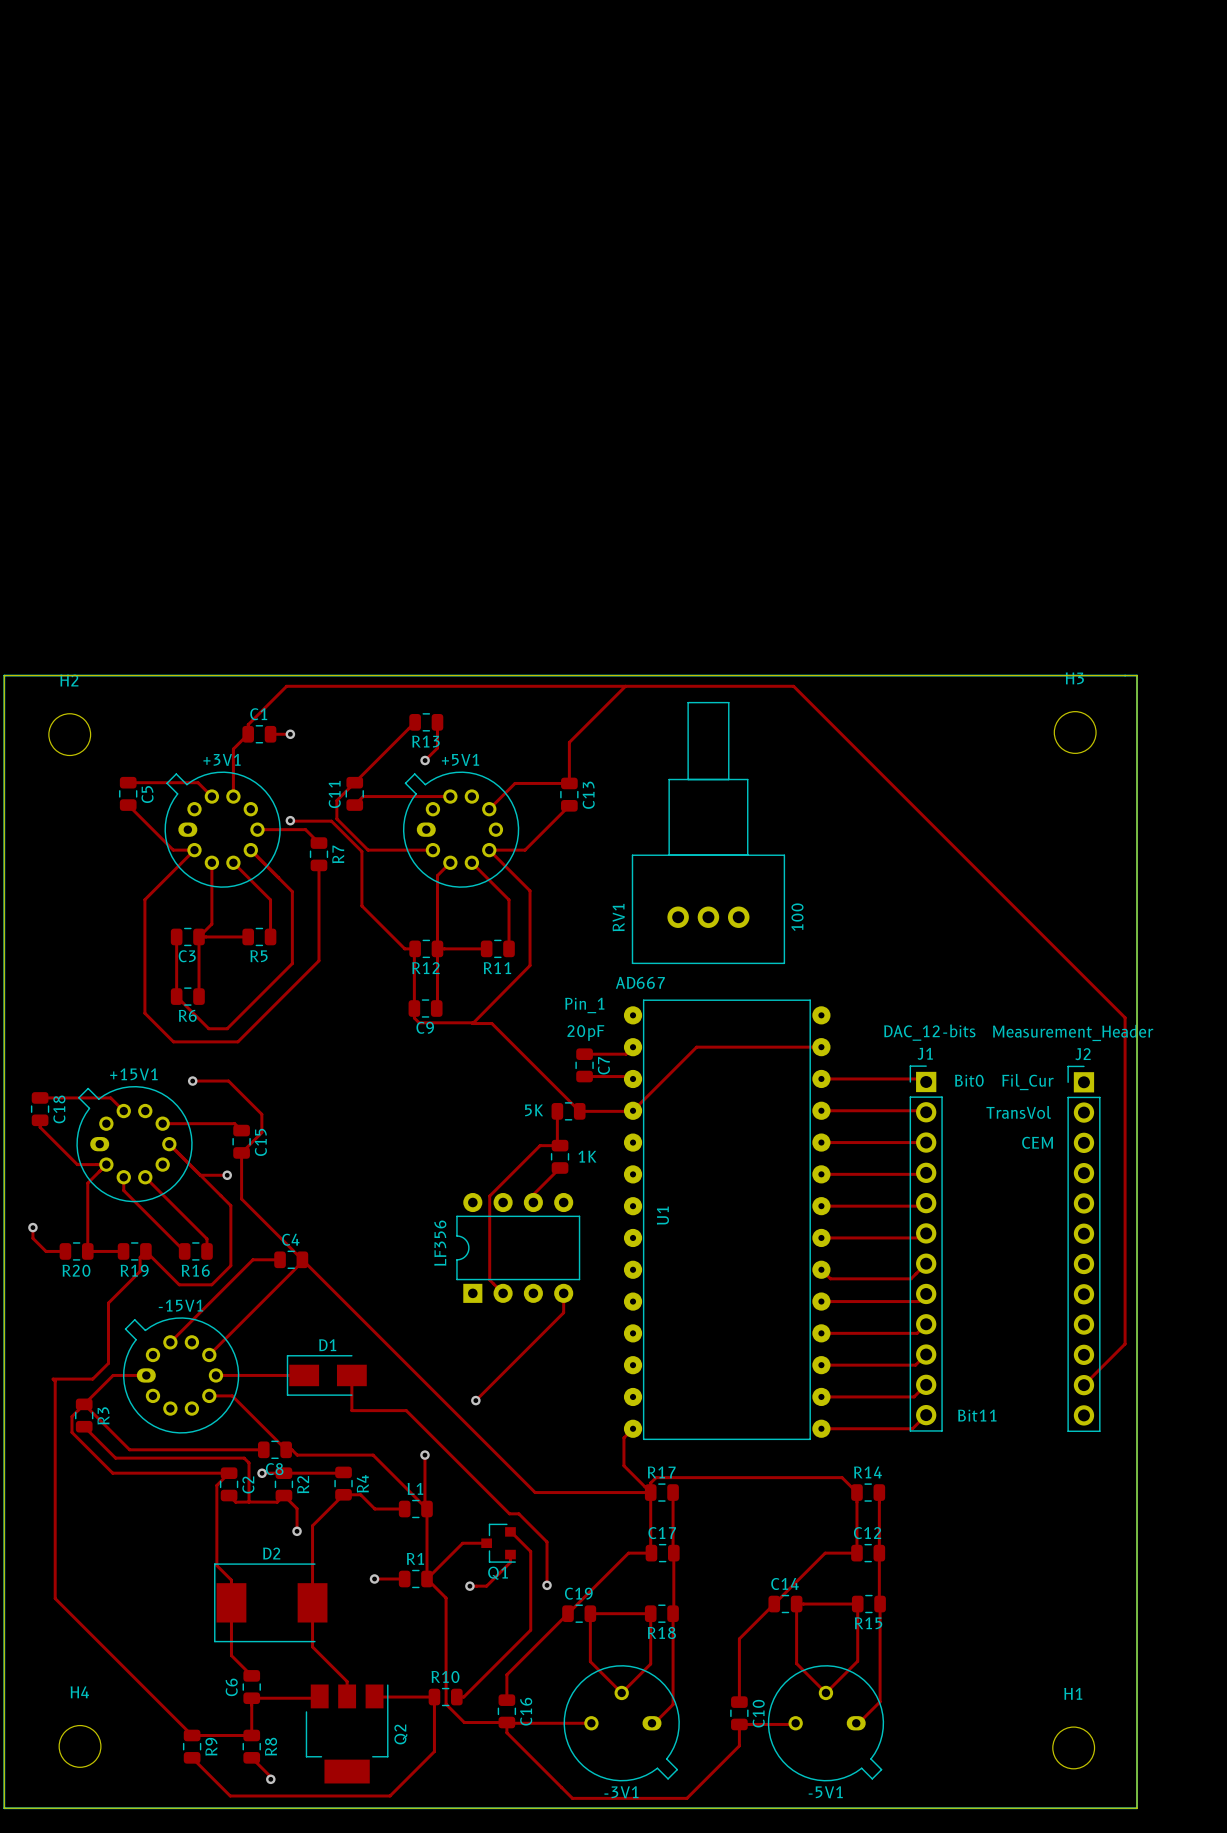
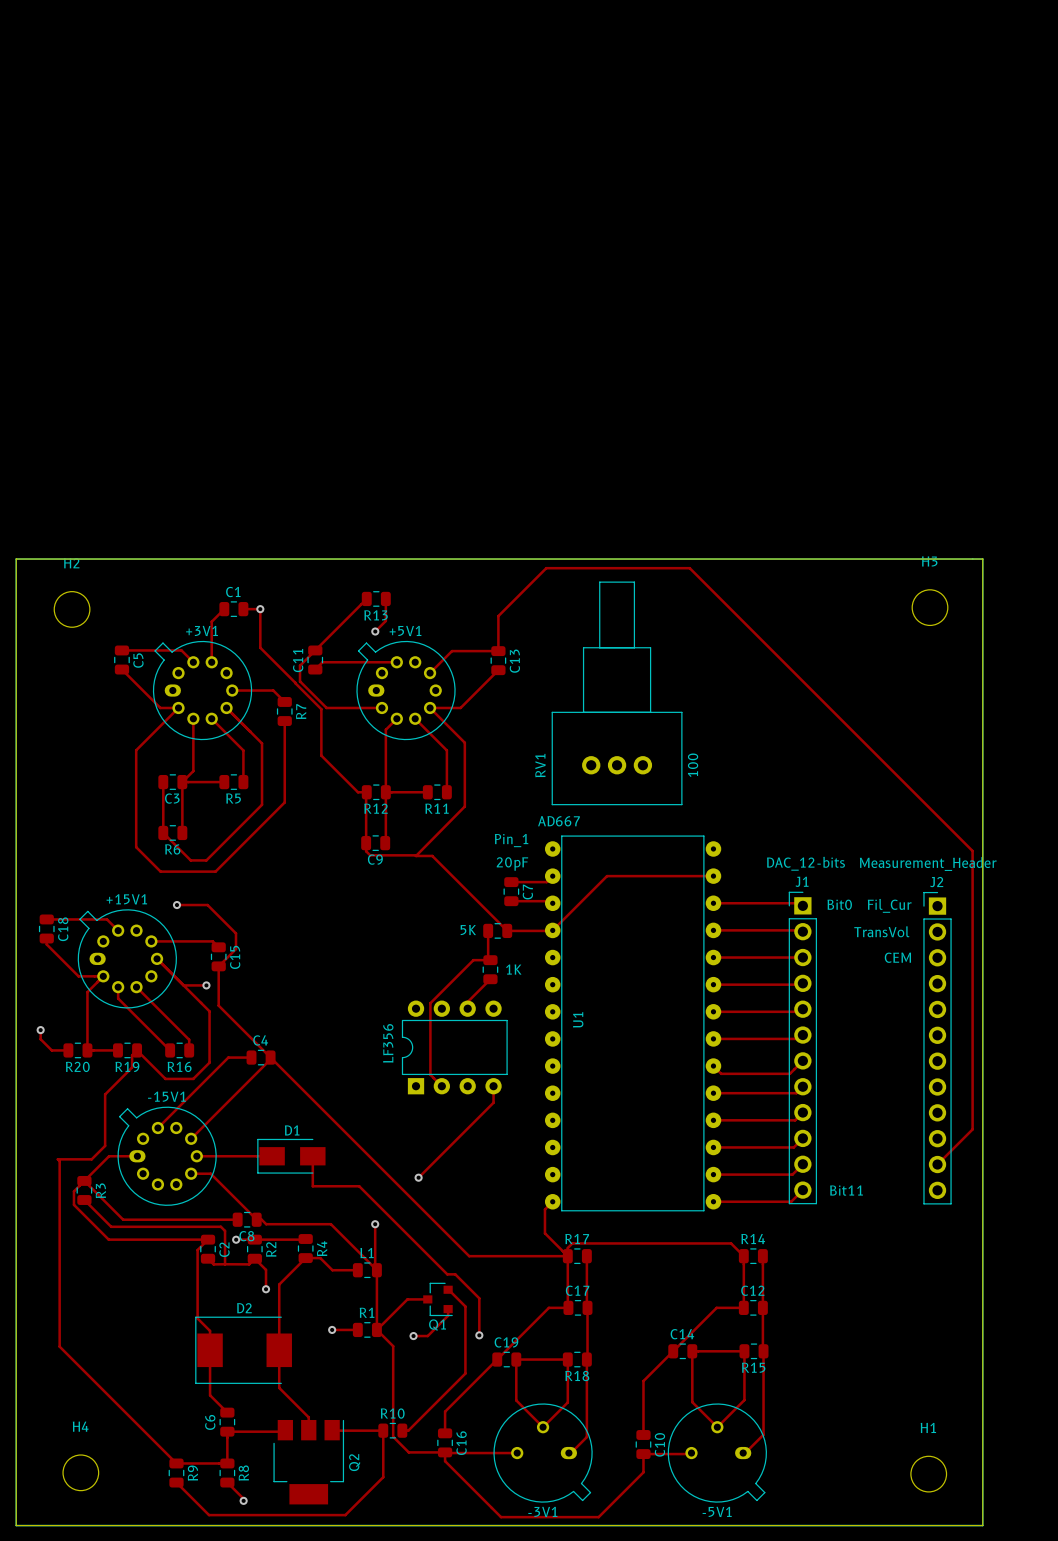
track: (625, 686) (286, 686) (248, 724) (248, 734) -> none
track: (290, 820) (331, 821) -> (260, 609) (260, 647) (295, 683)
via: (290, 820) -> none

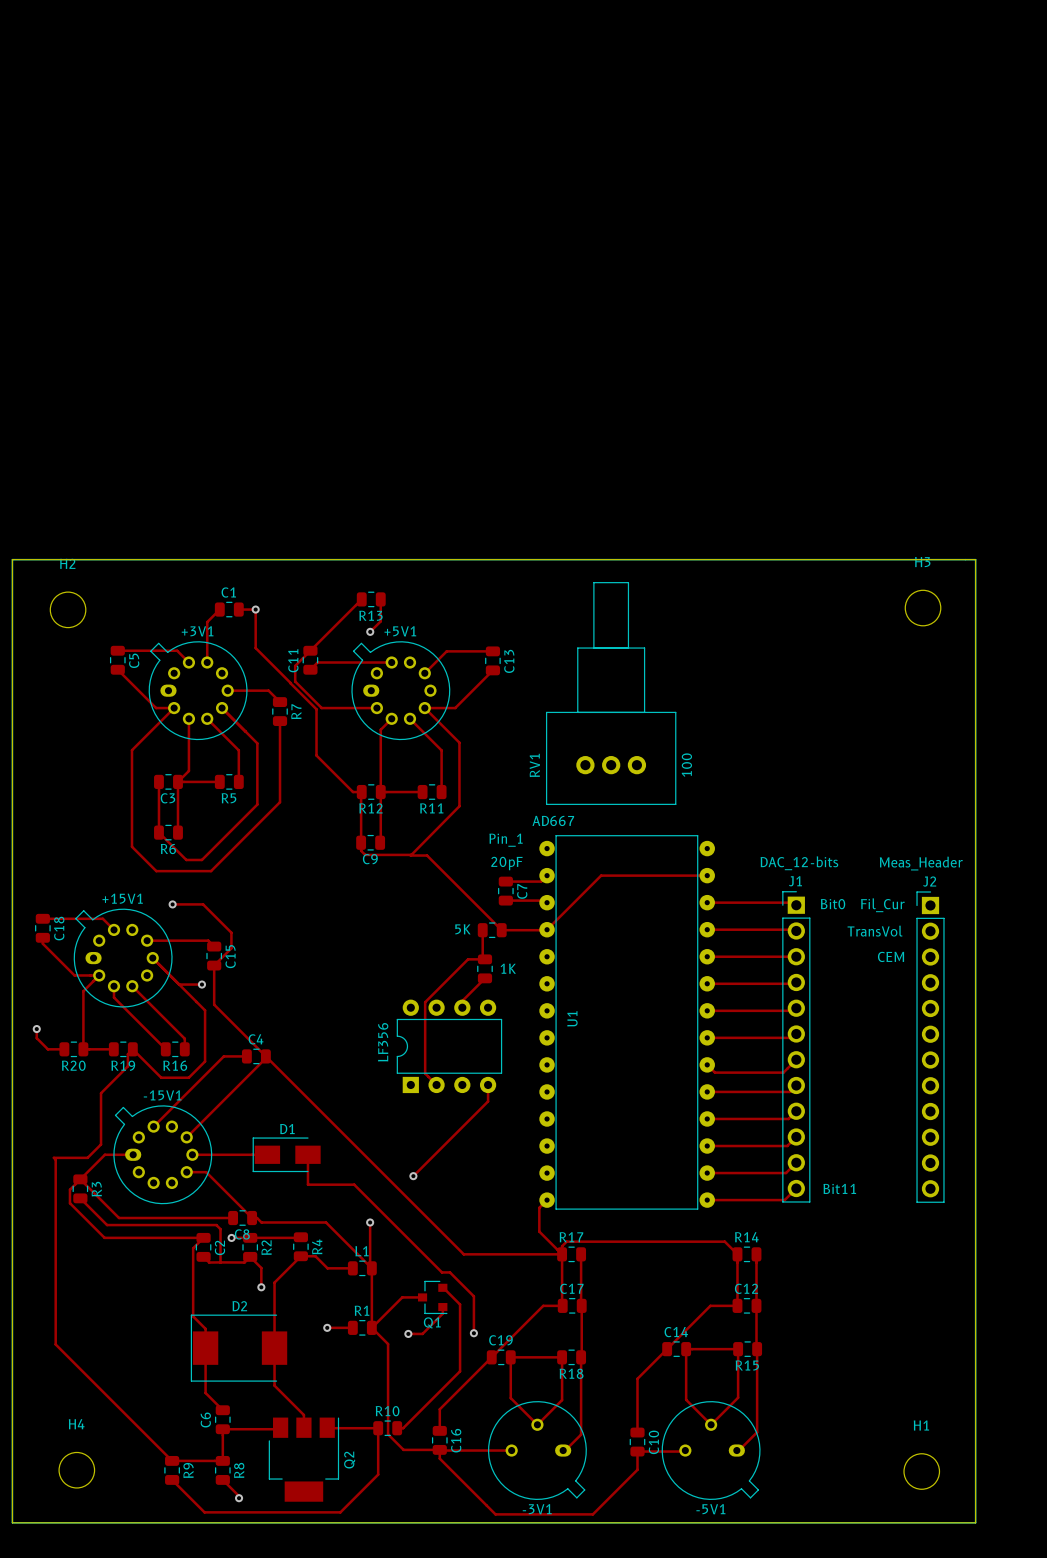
track: (498, 651) (498, 616) (546, 568) (689, 568) (972, 851) (972, 1129) (937, 1164) -> none
J2 value: Measurement_Header (928, 864) -> Meas_Header (921, 863)

